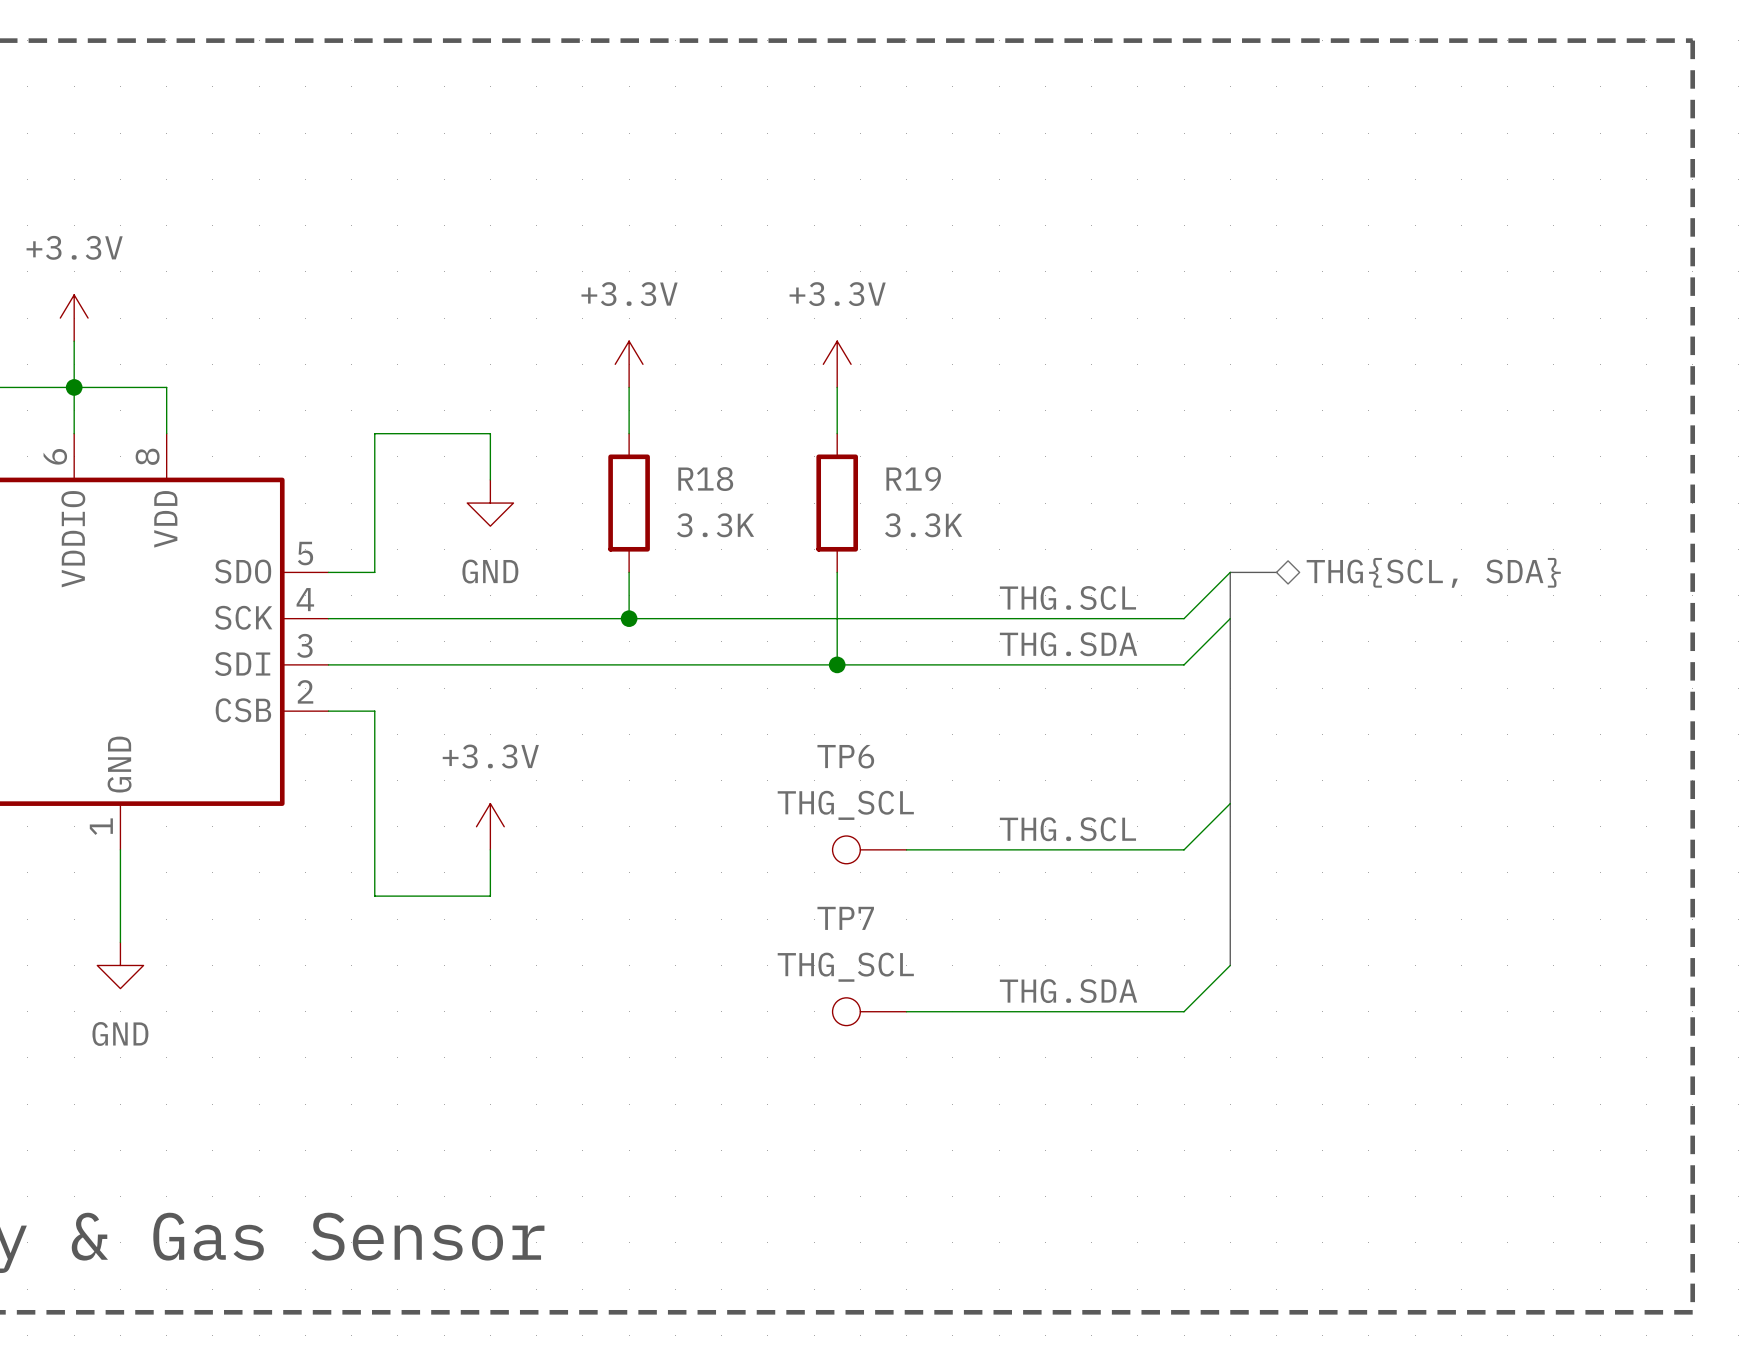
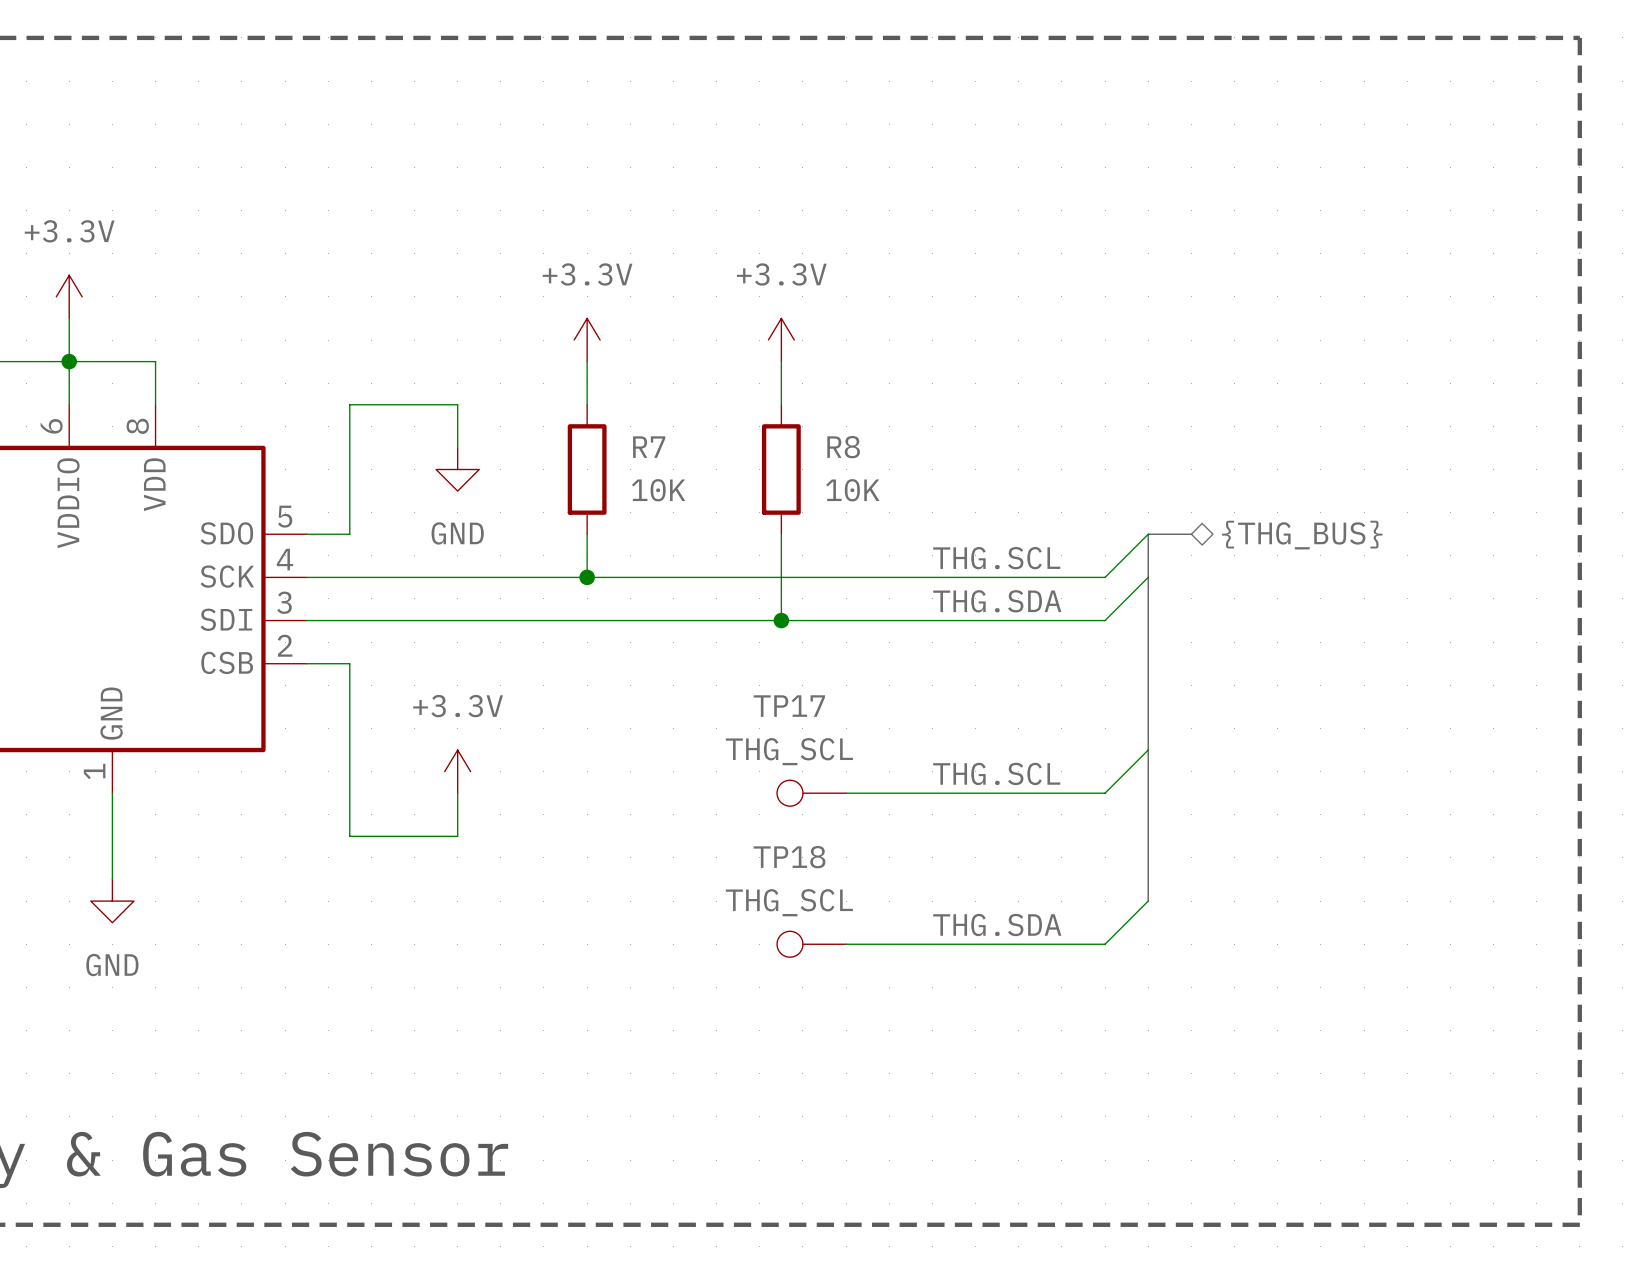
R19 name: R19 (913, 478) -> R8 (843, 447)
R18 name: R18 (705, 479) -> R7 (649, 447)
R18 value: 3.3K (715, 525) -> 10K (658, 490)
R19 value: 3.3K (923, 525) -> 10K (852, 490)
hierarchical label: THG{SCL, SDA} (1433, 572) -> {THG_BUS} (1302, 535)
TP6 name: TP6 (845, 756) -> TP17 (789, 706)
TP7 name: TP7 (845, 918) -> TP18 (789, 857)

